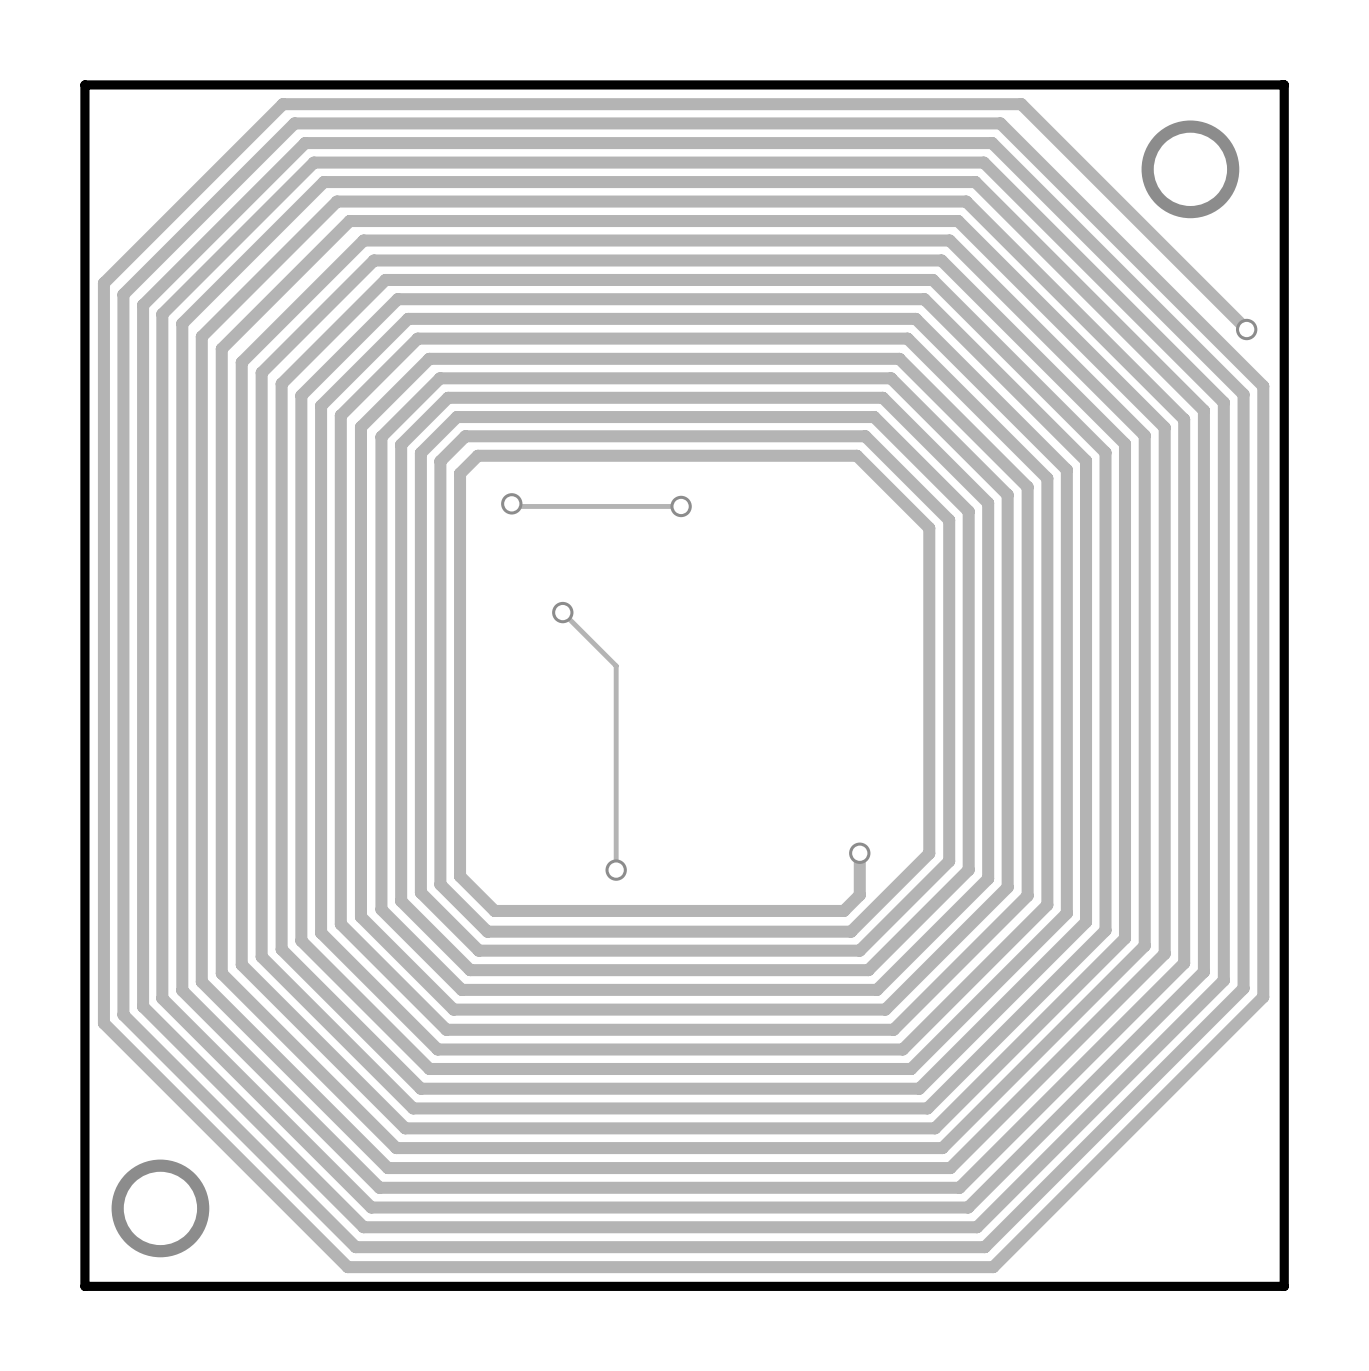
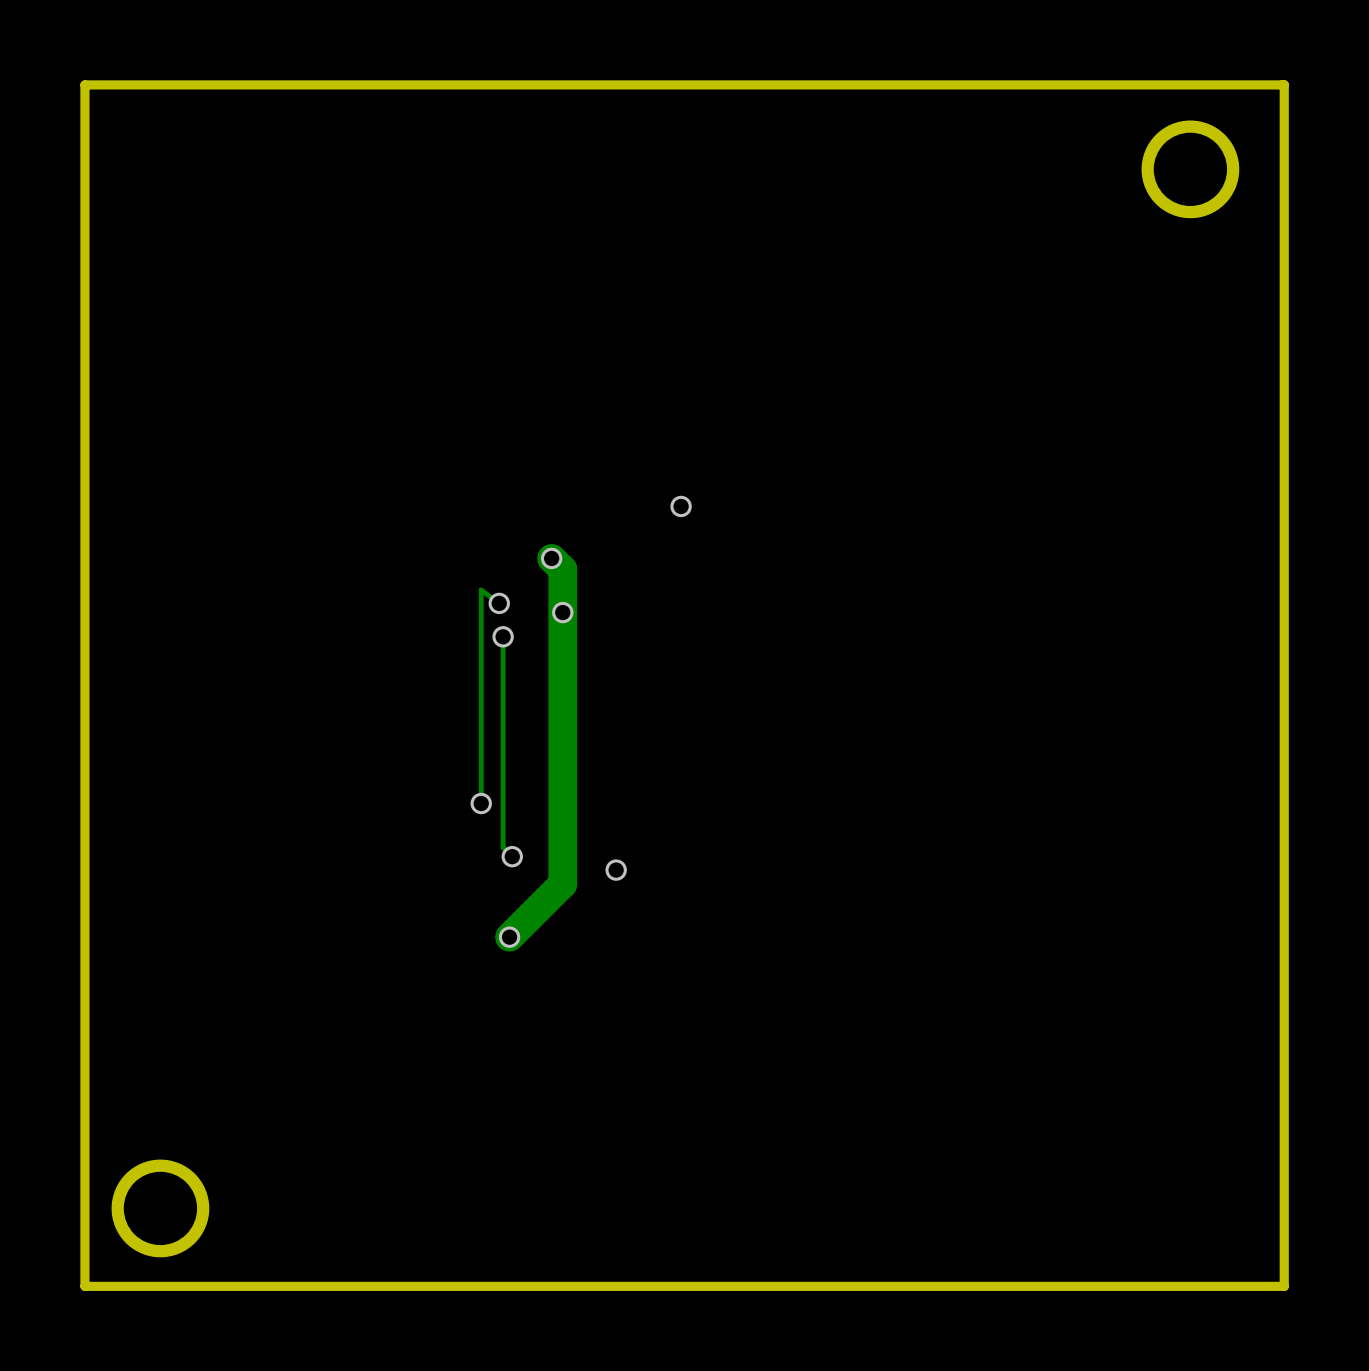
track: (1246, 329) (1021, 104) (282, 104) (103, 283) (103, 1023) (347, 1267) (993, 1267) (1263, 997) (1263, 386) (1000, 123) (294, 123) (123, 294) (123, 1014) (355, 1247) (984, 1247) (1243, 988) (1243, 394) (992, 143) (305, 143) (143, 305) (143, 1006) (363, 1227) (977, 1227) (1223, 980) (1223, 402) (983, 162) (313, 162) (162, 314) (162, 998) (371, 1207) (968, 1207) (1203, 971) (1203, 410) (975, 182) (323, 182) (182, 323) (182, 990) (379, 1187) (959, 1187) (1184, 963) (1184, 419) (966, 201) (336, 201) (201, 336) (201, 981) (387, 1168) (950, 1168) (1164, 953) (1164, 427) (958, 221) (349, 221) (221, 348) (221, 973) (396, 1148) (942, 1148) (1144, 945) (1144, 435) (949, 240) (363, 240) (241, 362) (241, 964) (405, 1128) (935, 1128) (1124, 938) (1124, 443) (941, 260) (373, 260) (261, 372) (261, 956) (413, 1108) (927, 1108) (1105, 930) (1105, 452) (932, 279) (385, 279) (281, 383) (281, 949) (420, 1088) (919, 1088) (1086, 922) (1086, 460) (924, 299) (397, 299) (301, 395) (301, 940) (429, 1068) (911, 1068) (1066, 913) (1066, 469) (915, 318) (408, 318) (321, 405) (321, 932) (437, 1049) (902, 1049) (1047, 904) (1047, 478) (907, 338) (417, 338) (340, 415) (340, 924) (446, 1029) (893, 1029) (1027, 895) (1027, 487) (899, 358) (429, 358) (360, 427) (360, 916) (453, 1009) (885, 1009) (1007, 887) (1007, 494) (891, 378) (440, 378) (381, 436) (381, 909) (461, 989) (877, 989) (988, 878) (988, 503) (882, 397) (448, 397) (401, 444) (401, 901) (470, 970) (868, 970) (968, 869) (968, 511) (874, 417) (456, 417) (420, 453) (420, 892) (478, 950) (859, 950) (949, 861) (949, 520) (865, 436) (465, 436) (440, 461) (440, 884) (487, 931) (851, 931) (929, 853) (929, 528) (856, 455) (477, 455) (460, 473) (460, 876) (494, 910) (843, 910) (859, 895) (859, 853) -> none
via: (1246, 329) -> none
track: (511, 503) (514, 506) (681, 506) -> none
via: (511, 503) -> none
track: none -> (551, 558) (562, 569) (562, 883) (509, 937)
via: none -> (551, 558)
track: none -> (499, 603) (481, 590) (481, 803)
via: none -> (499, 603)
track: (562, 612) (616, 665) (616, 870) -> none
track: none -> (503, 636) (503, 847) (512, 856)
via: none -> (503, 636)
via: none -> (481, 803)
via: (859, 853) -> none
via: none -> (512, 856)
via: none -> (509, 937)

